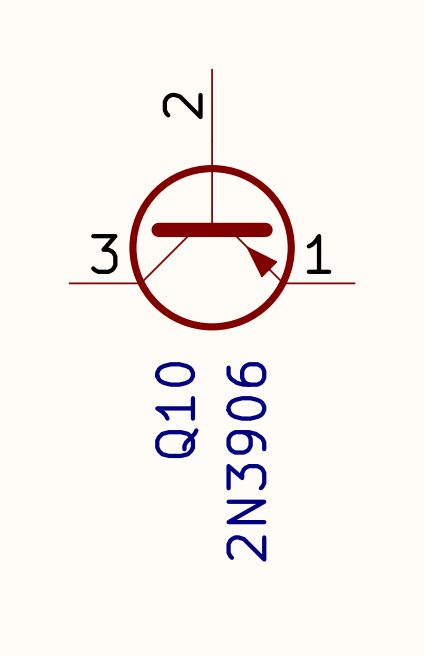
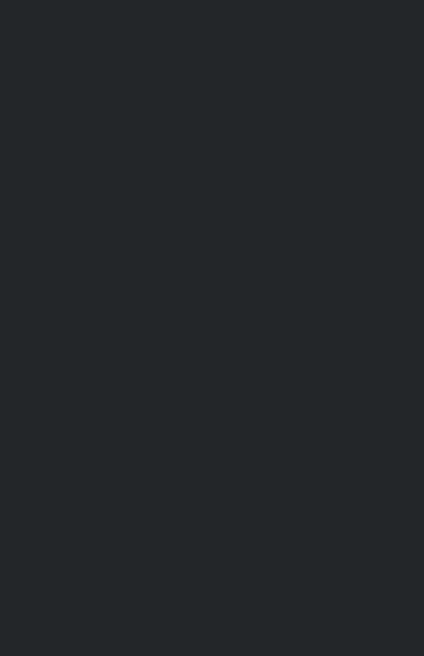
Q10: 2N3906 (212, 199) -> none

